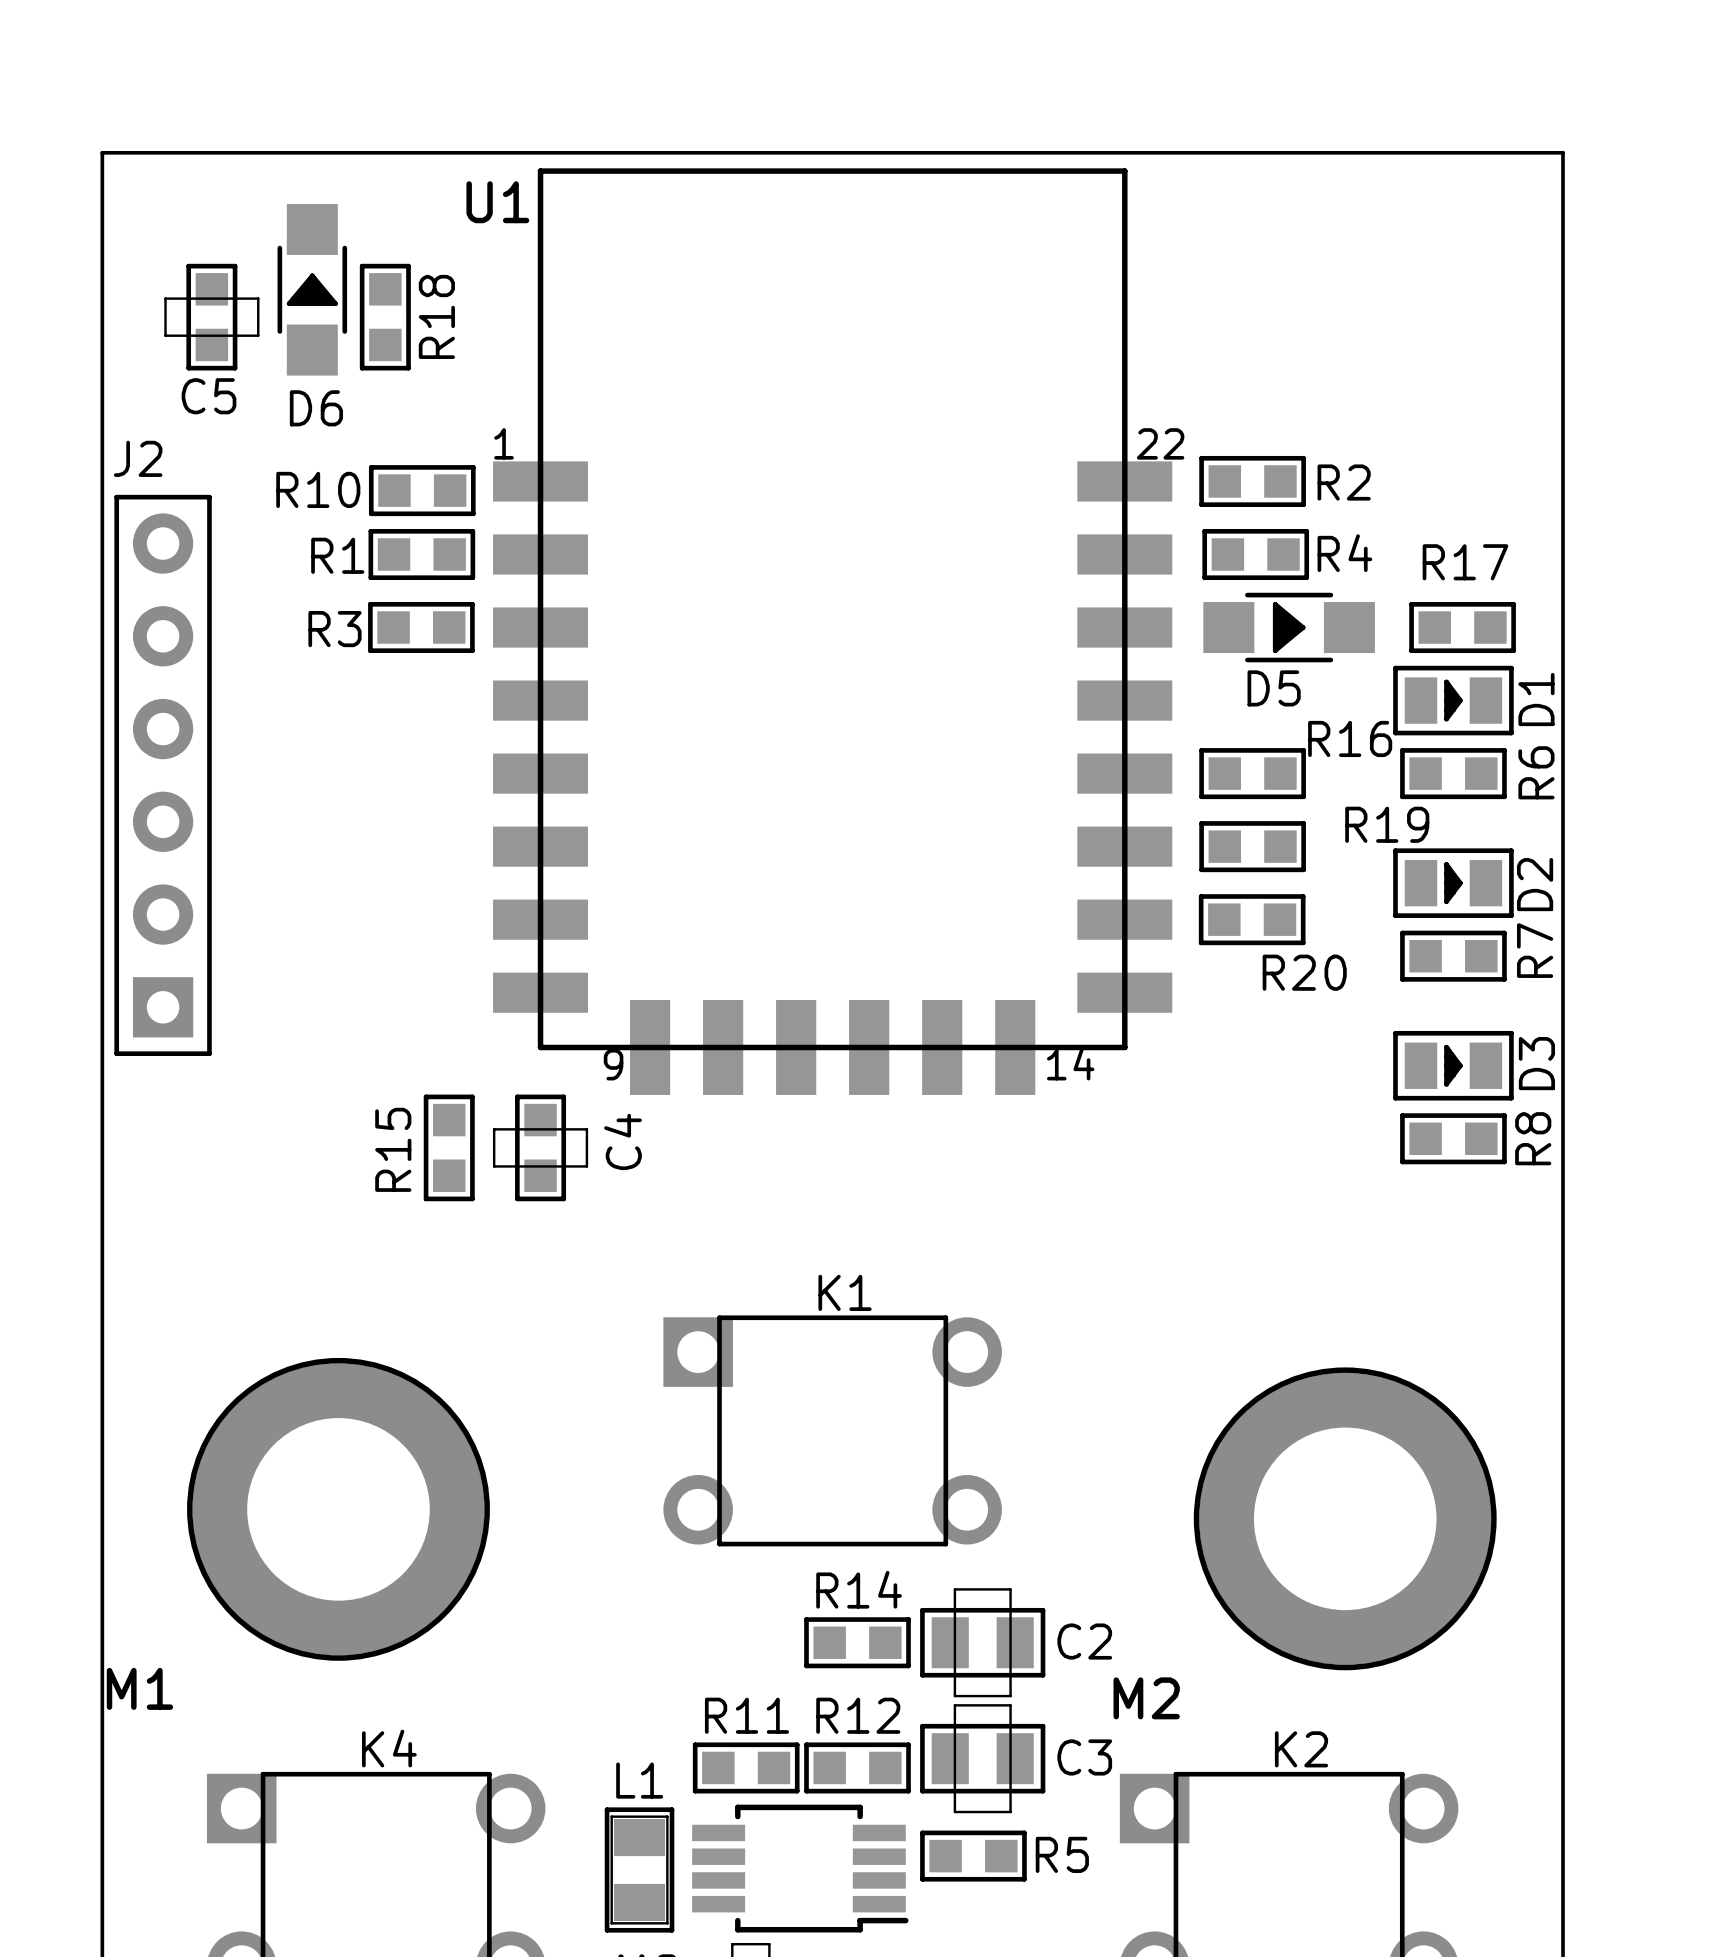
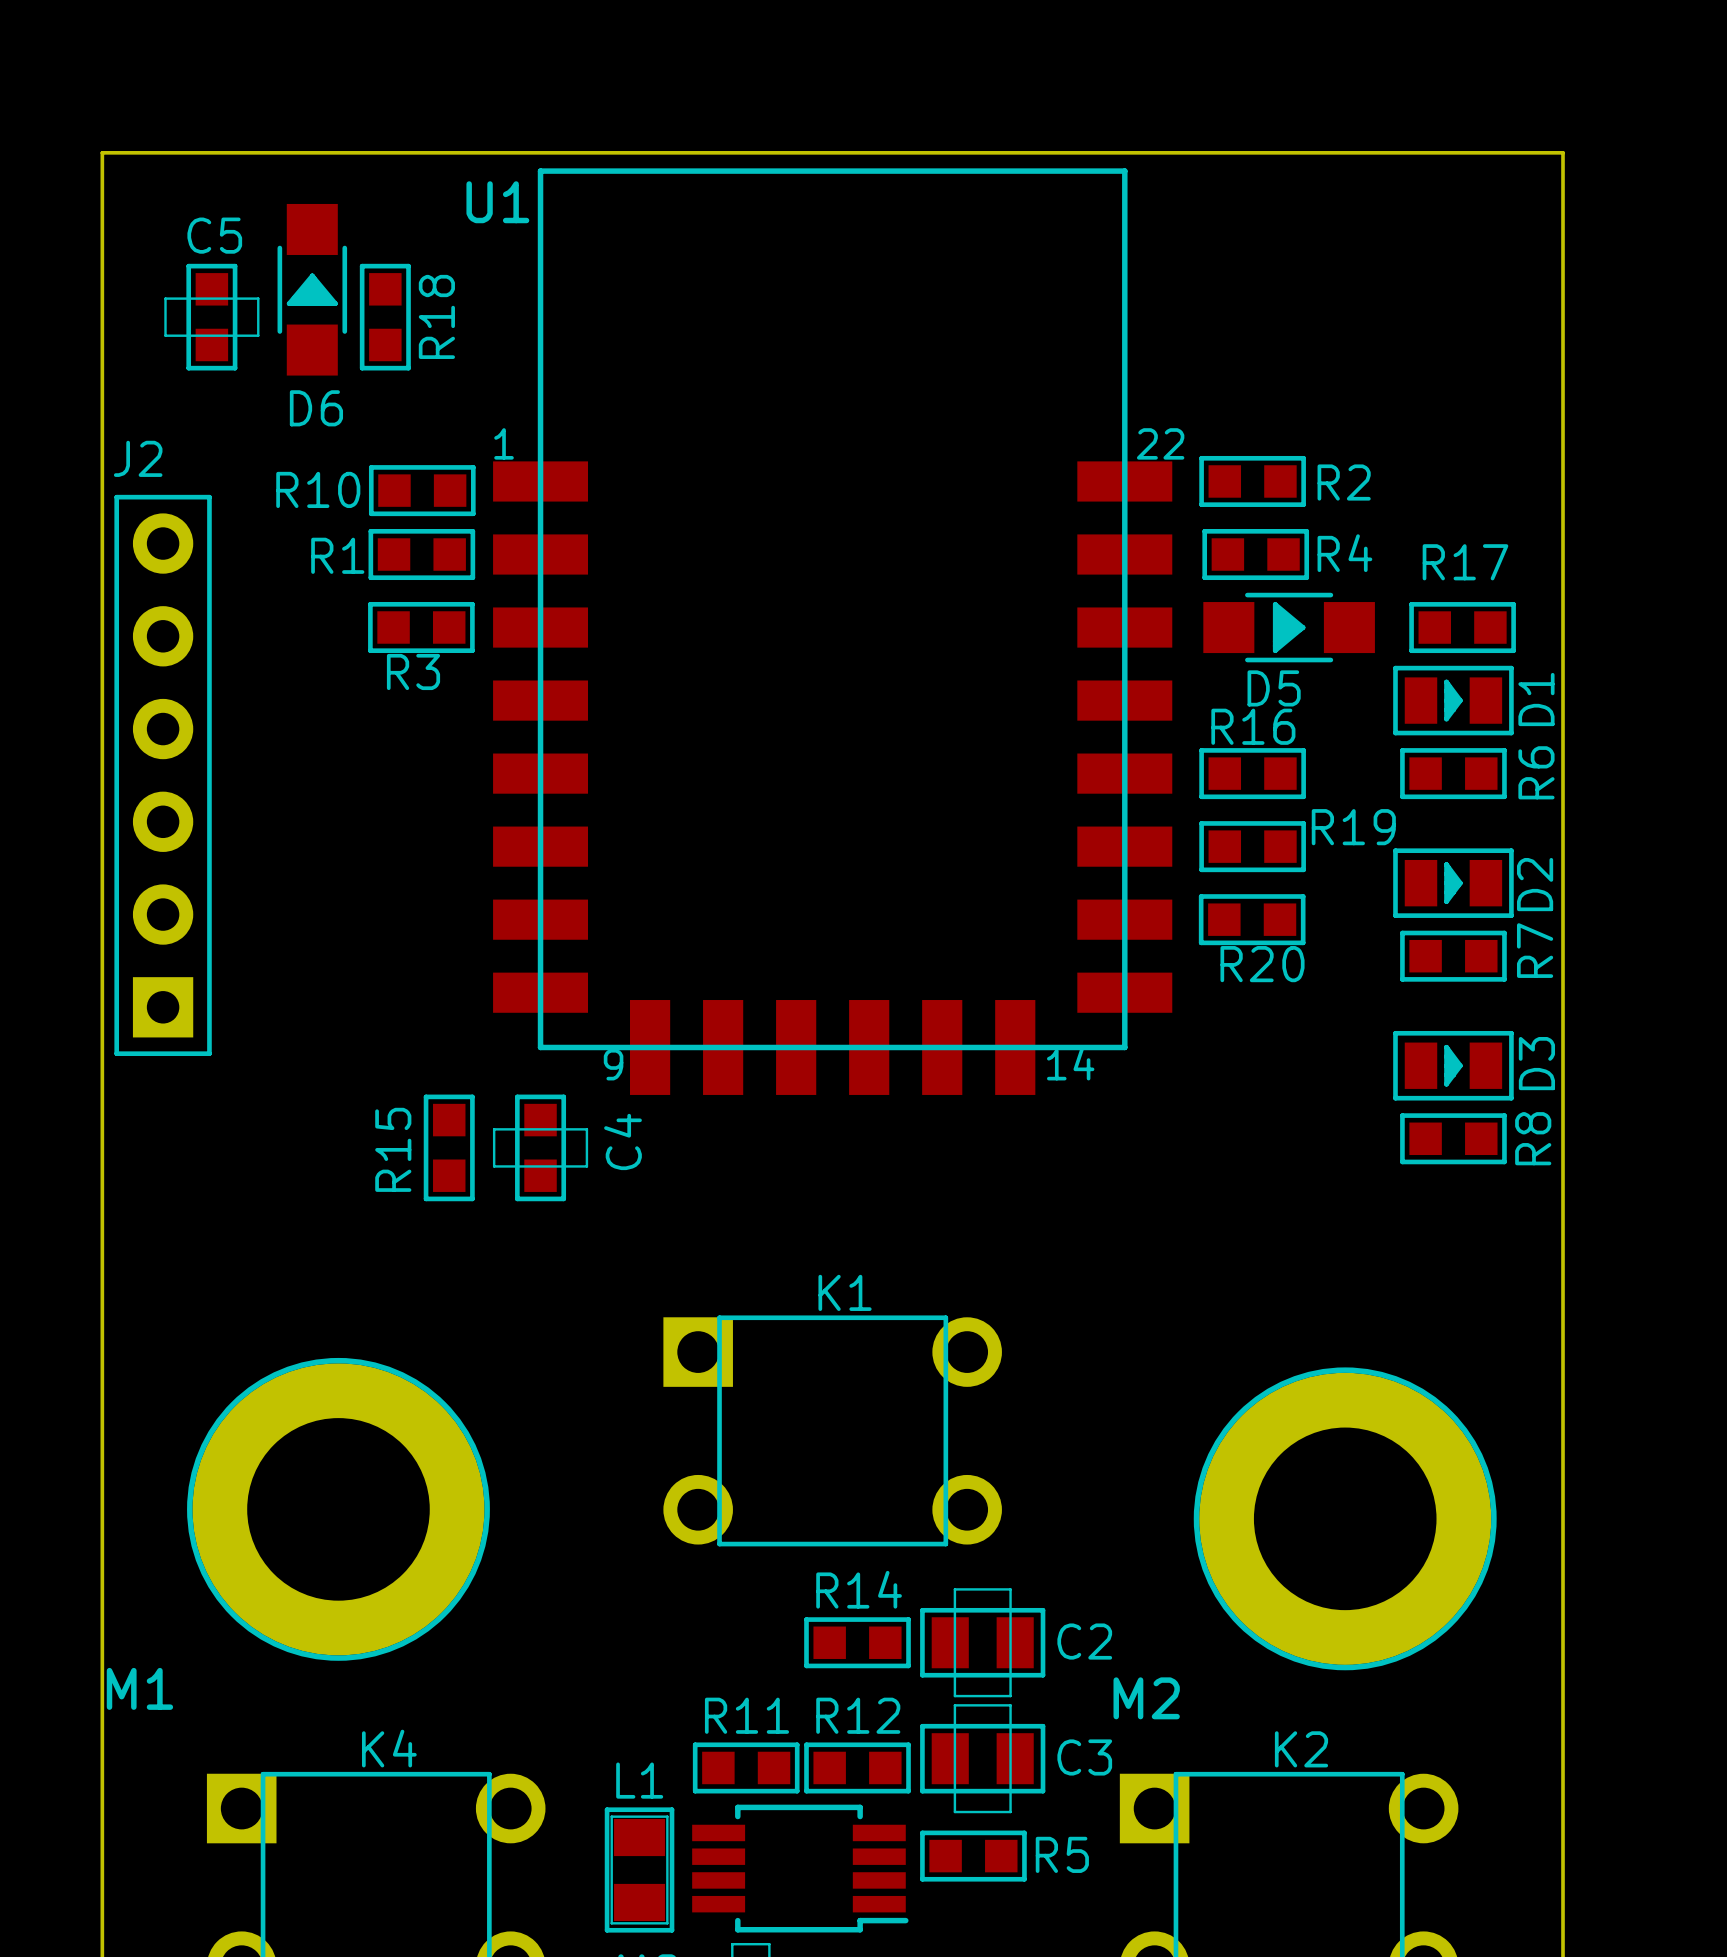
C5 name position: C5 (209, 396) -> C5 (214, 235)
R3 name position: R3 (334, 629) -> R3 (413, 671)
R16 name position: R16 (1350, 738) -> R16 (1253, 726)
R19 name position: R19 (1387, 824) -> R19 (1353, 827)
R20 name position: R20 (1304, 972) -> R20 (1262, 964)

